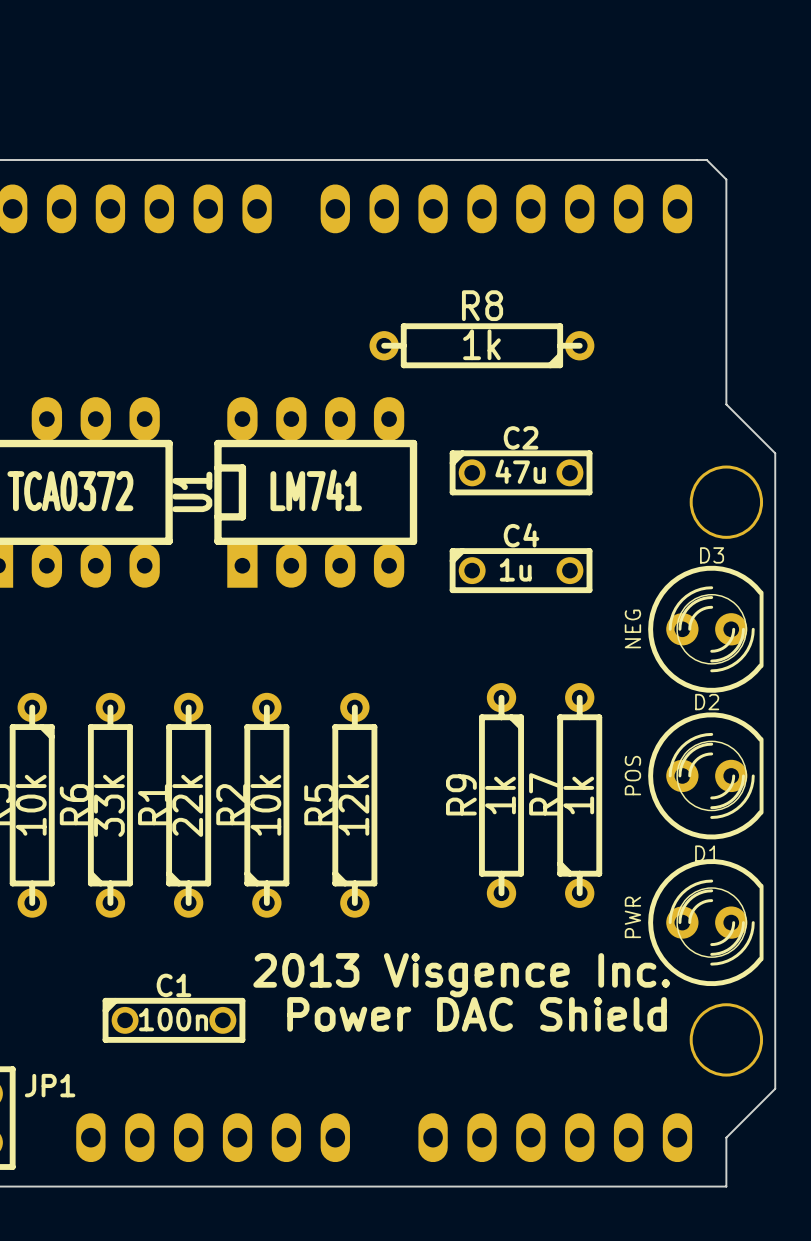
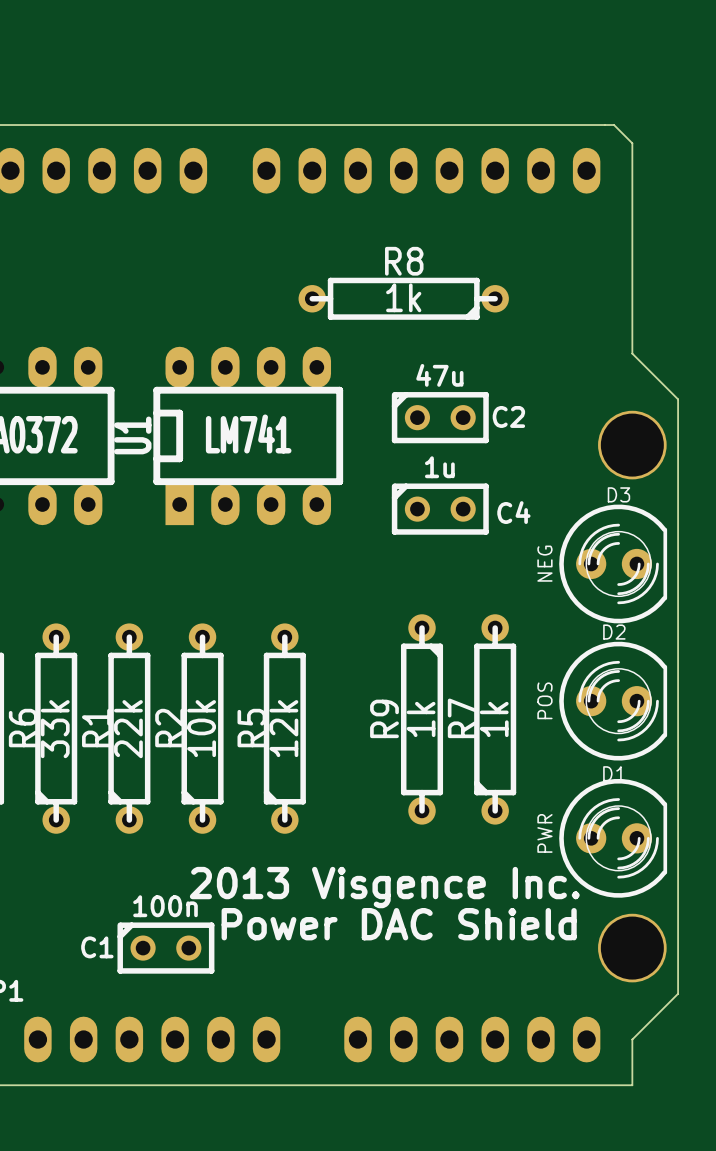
C2 name position: C2 (521, 437) -> C2 (508, 416)
C2 footprint: [449, 450, 593, 496] -> [391, 392, 489, 444]
C2 value position: 47u (520, 471) -> 47u (439, 375)
C4 name position: C4 (521, 535) -> C4 (513, 512)
C4 footprint: [449, 548, 593, 594] -> [391, 483, 489, 535]
C4 value position: 1u (515, 569) -> 1u (439, 467)
C1 name position: C1 (173, 985) -> C1 (97, 947)
C1 footprint: [102, 997, 246, 1043] -> [117, 922, 215, 974]
C1 value position: 100n (173, 1019) -> 100n (165, 906)

